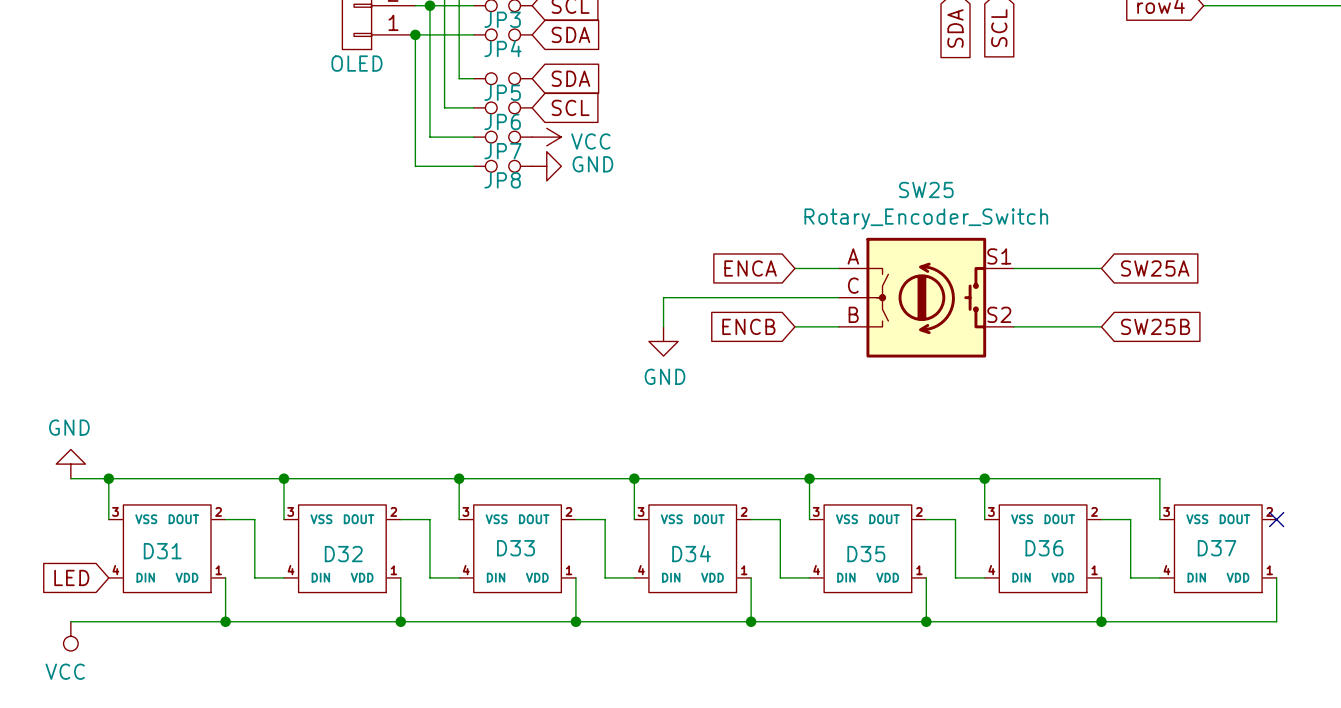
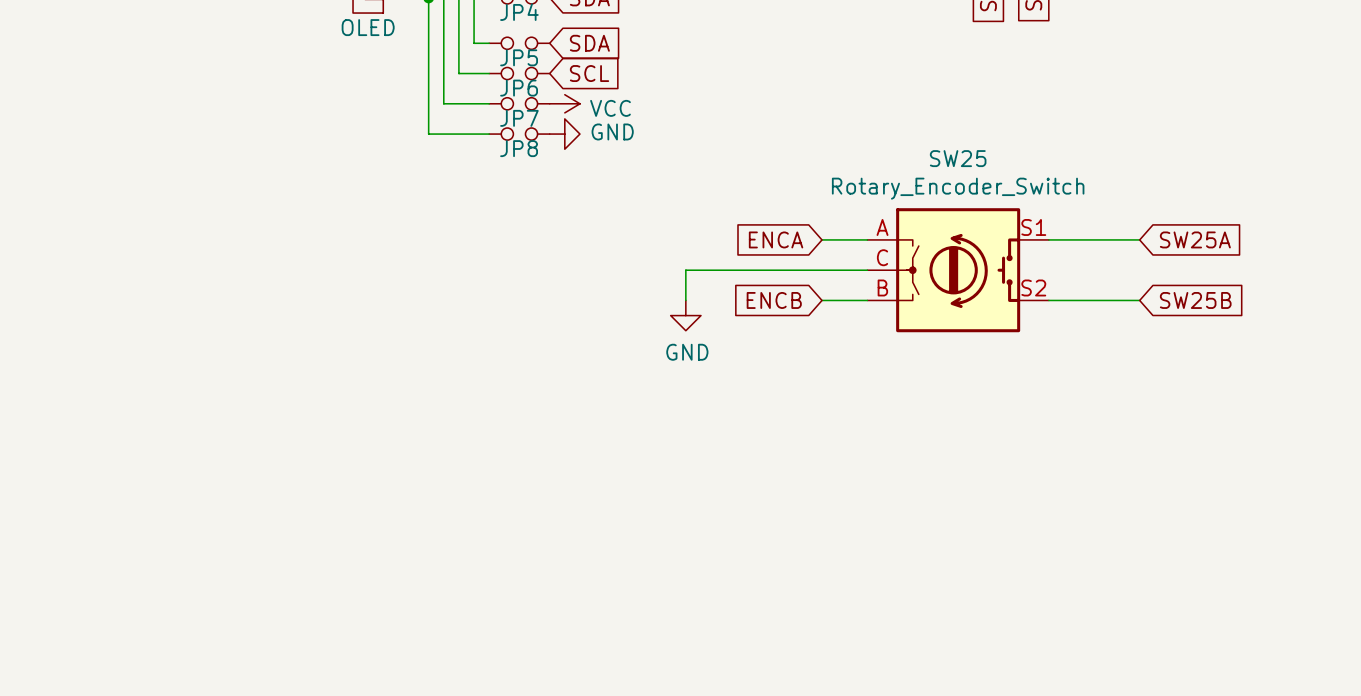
power symbol: GND (70, 464) -> none
wire: (70, 478) (1159, 478) (1159, 519) -> none
wire: (108, 478) (108, 519) -> none
junction: (108, 478) -> none
wire: (283, 478) (283, 519) -> none
junction: (283, 478) -> none
wire: (459, 478) (459, 519) -> none
junction: (459, 478) -> none
wire: (634, 478) (634, 519) -> none
junction: (634, 478) -> none
wire: (809, 478) (809, 519) -> none
junction: (809, 478) -> none
wire: (984, 478) (984, 519) -> none
junction: (984, 478) -> none
wire: (225, 519) (254, 519) (254, 577) (283, 577) -> none
wire: (400, 519) (429, 519) (429, 577) (459, 577) -> none
wire: (575, 519) (605, 519) (605, 577) (634, 577) -> none
wire: (751, 519) (780, 519) (780, 577) (809, 577) -> none
wire: (926, 519) (955, 519) (955, 577) (984, 577) -> none
wire: (1101, 519) (1130, 519) (1130, 577) (1159, 577) -> none
no-connect mark: (1276, 519) -> none
D31: (167, 548) -> none
D32: (342, 548) -> none
D33: (517, 548) -> none
D34: (692, 548) -> none
D35: (867, 548) -> none
D36: (1043, 548) -> none
D37: (1218, 548) -> none
global label: LED (71, 577) -> none
wire: (225, 577) (225, 621) -> none
wire: (400, 577) (400, 621) -> none
wire: (575, 577) (575, 621) -> none
wire: (751, 577) (751, 621) -> none
wire: (926, 577) (926, 621) -> none
wire: (1101, 577) (1101, 621) -> none
wire: (1276, 577) (1276, 621) (70, 621) -> none
junction: (225, 621) -> none
junction: (400, 621) -> none
junction: (575, 621) -> none
junction: (751, 621) -> none
junction: (926, 621) -> none
junction: (1101, 621) -> none
power symbol: VCC (70, 636) -> none

